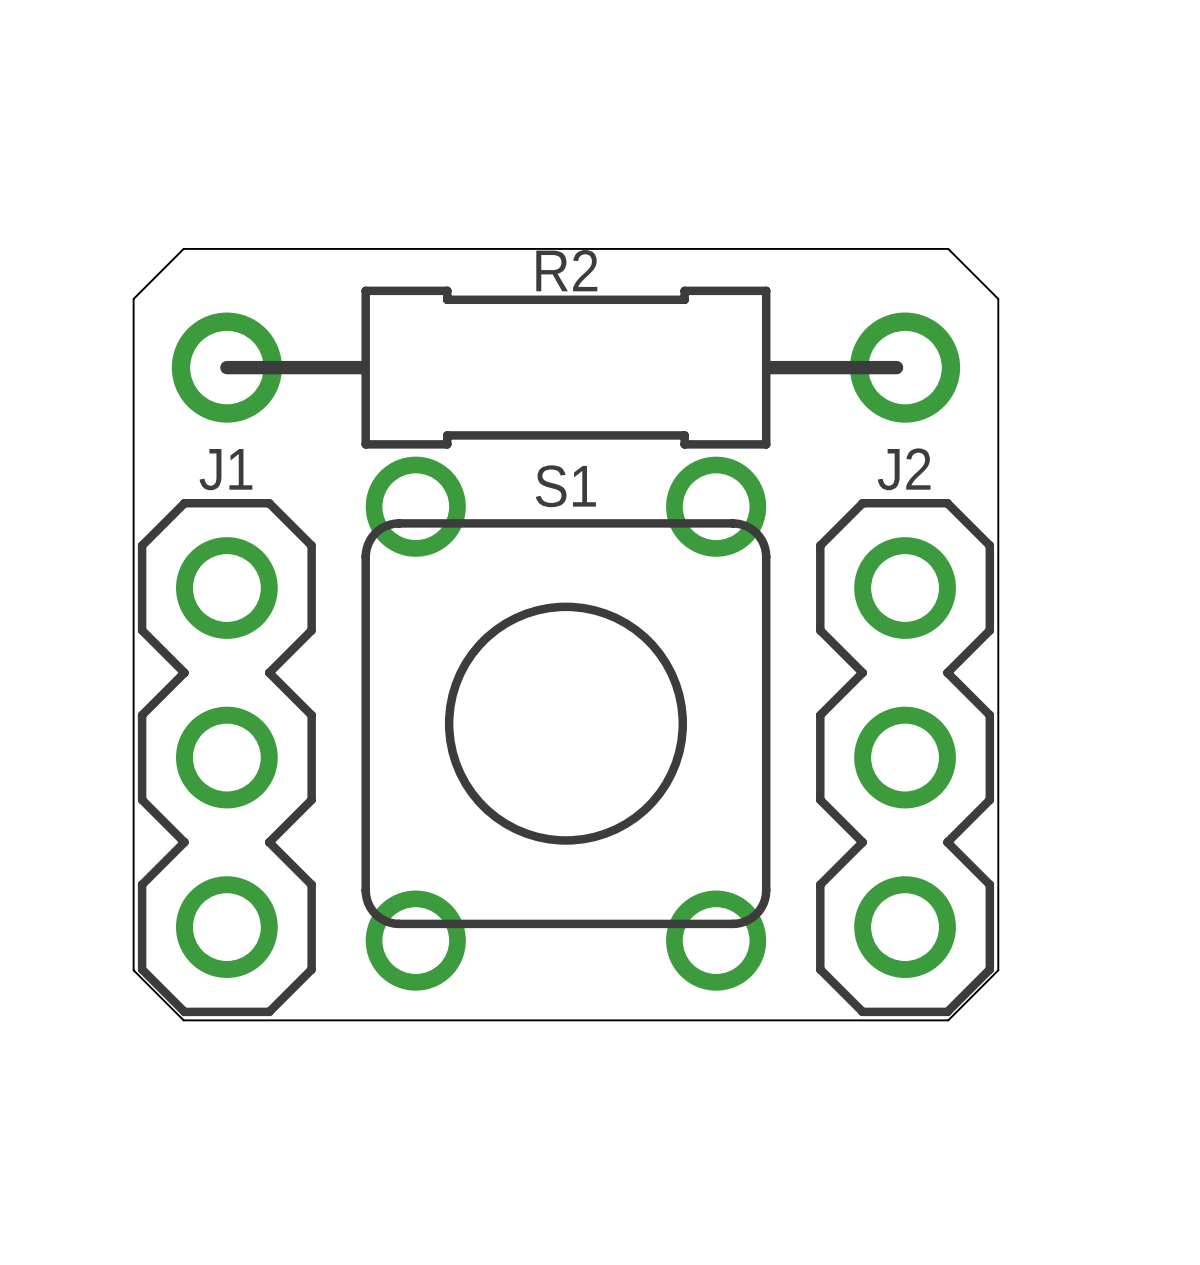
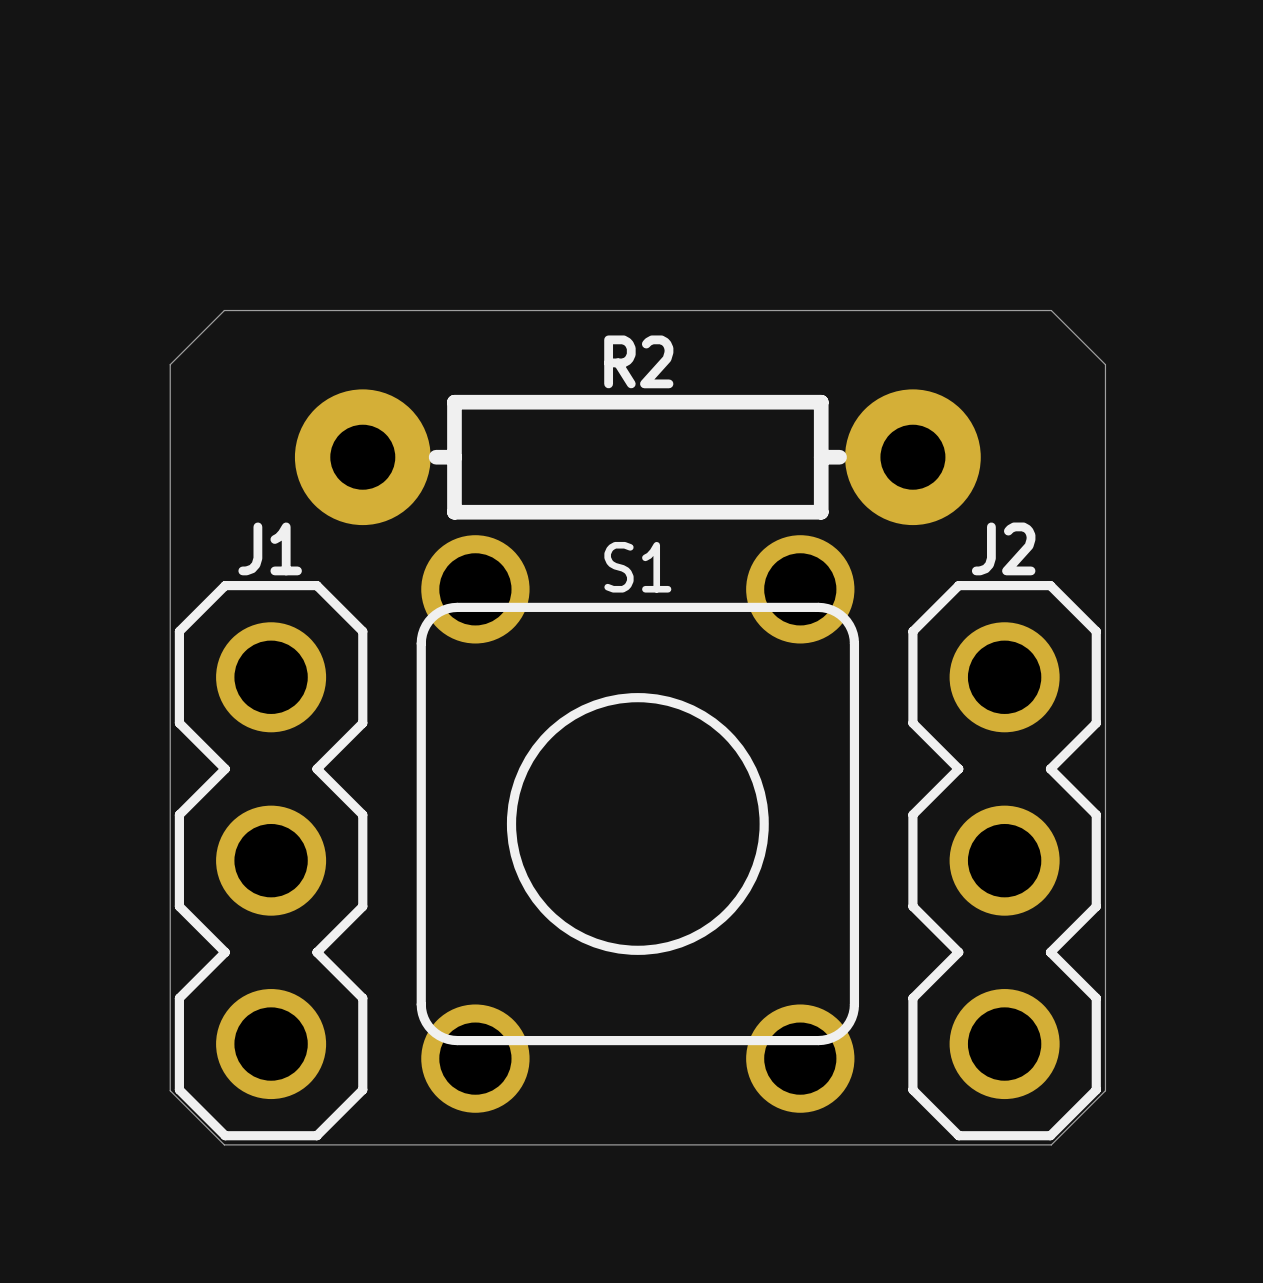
R2 footprint: [171, 286, 961, 449] -> [294, 389, 981, 526]

